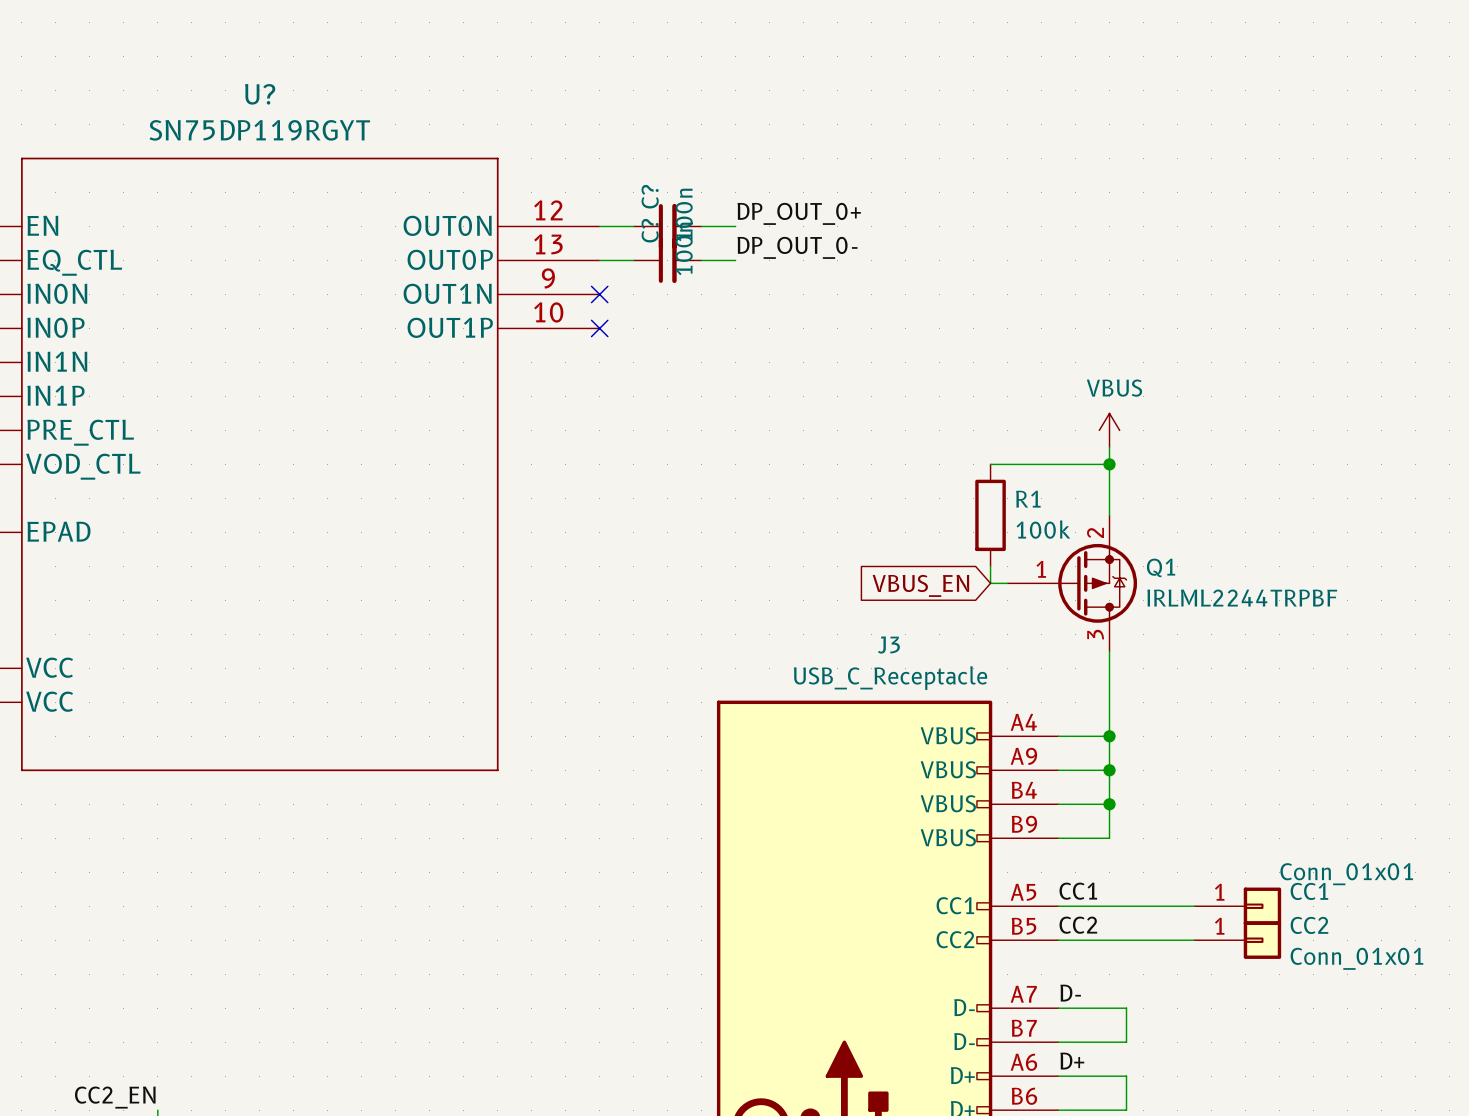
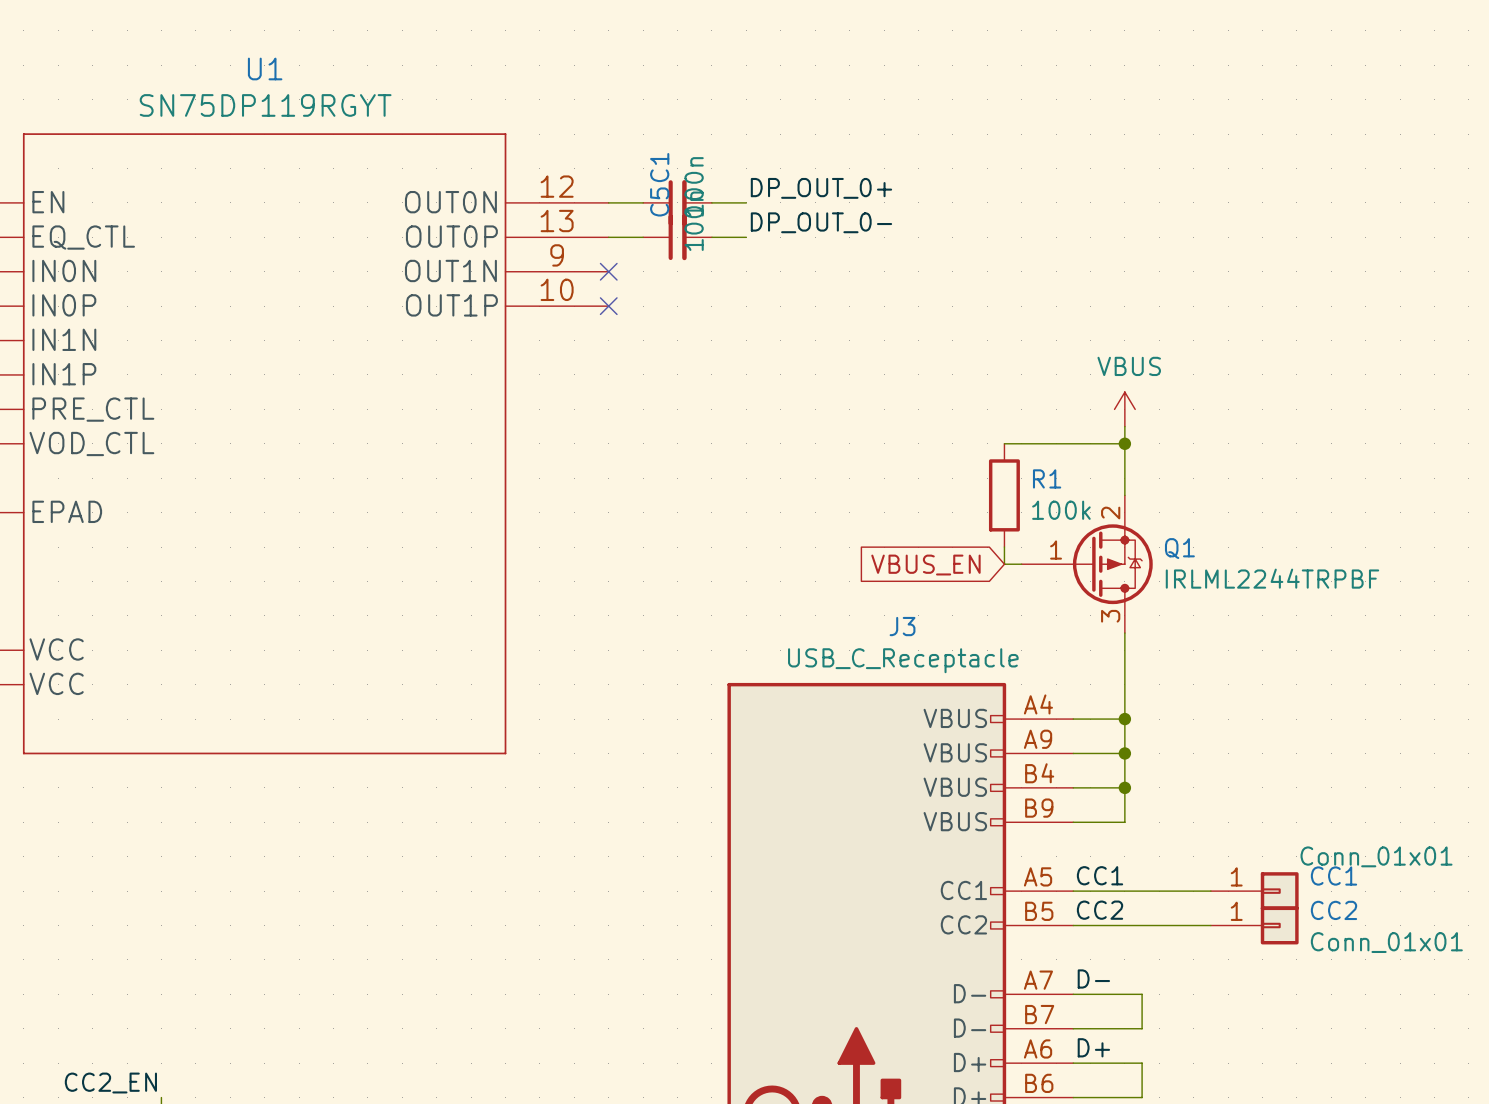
U? name: U? (260, 94) -> U1 (265, 68)
C? name: C? (650, 196) -> C1 (659, 167)
C? name: C? (650, 230) -> C5 (659, 201)

